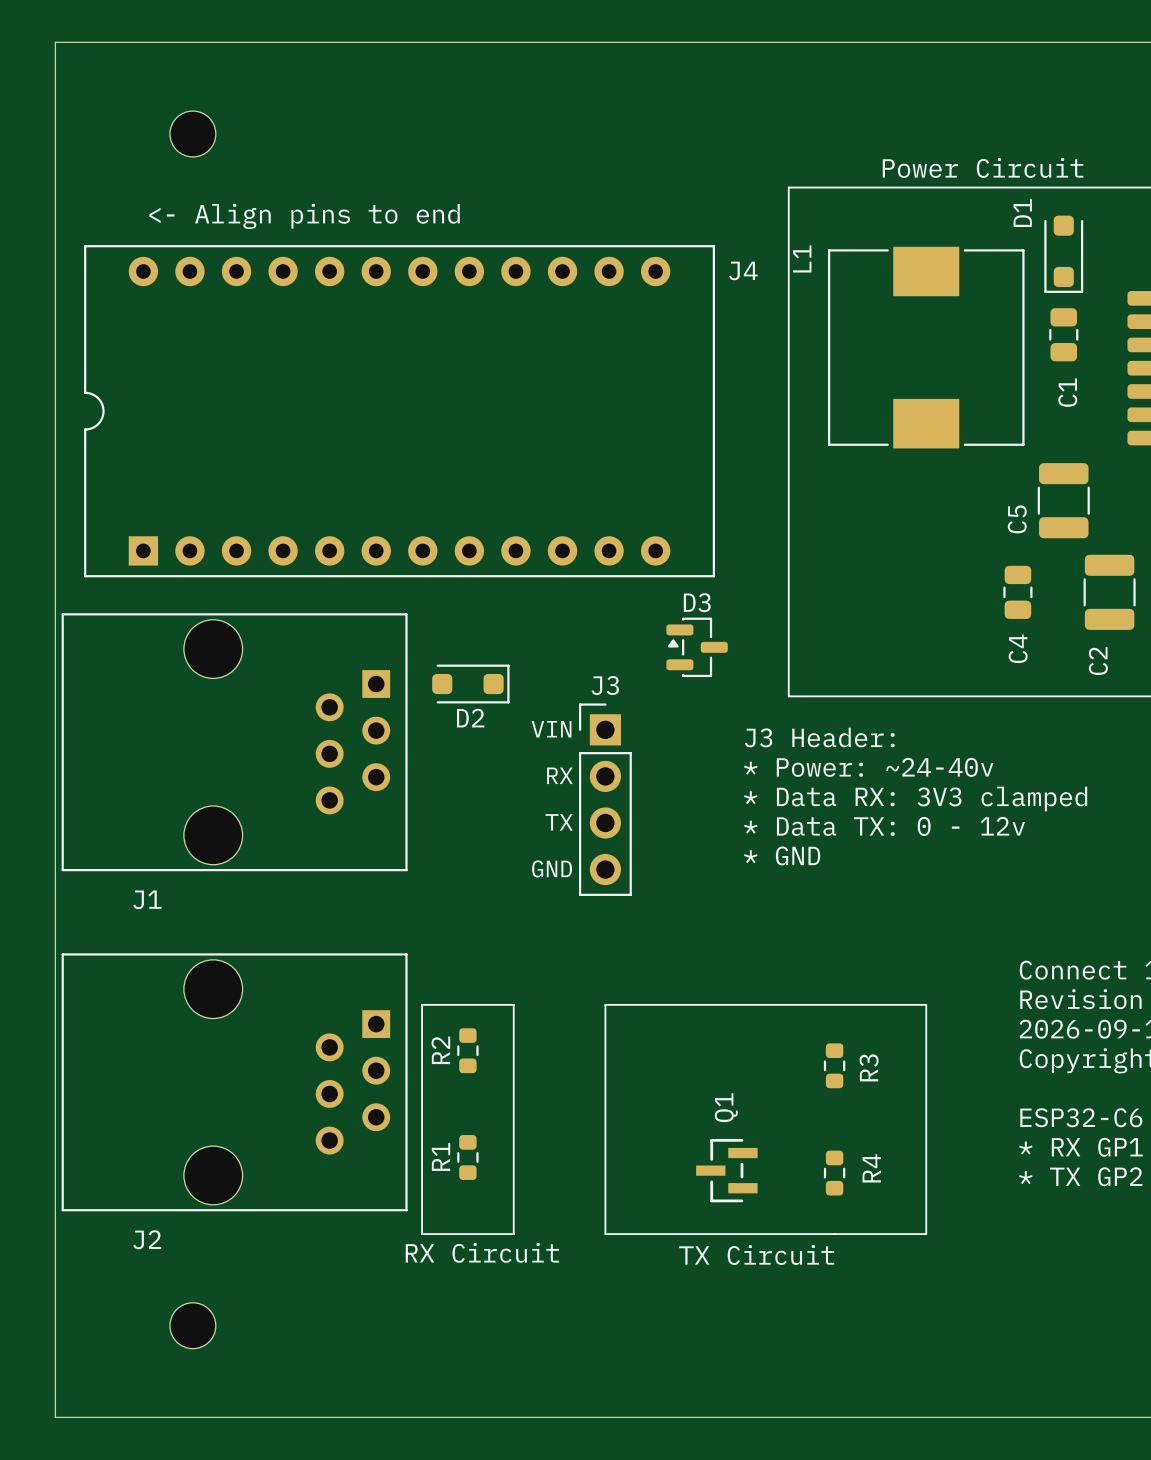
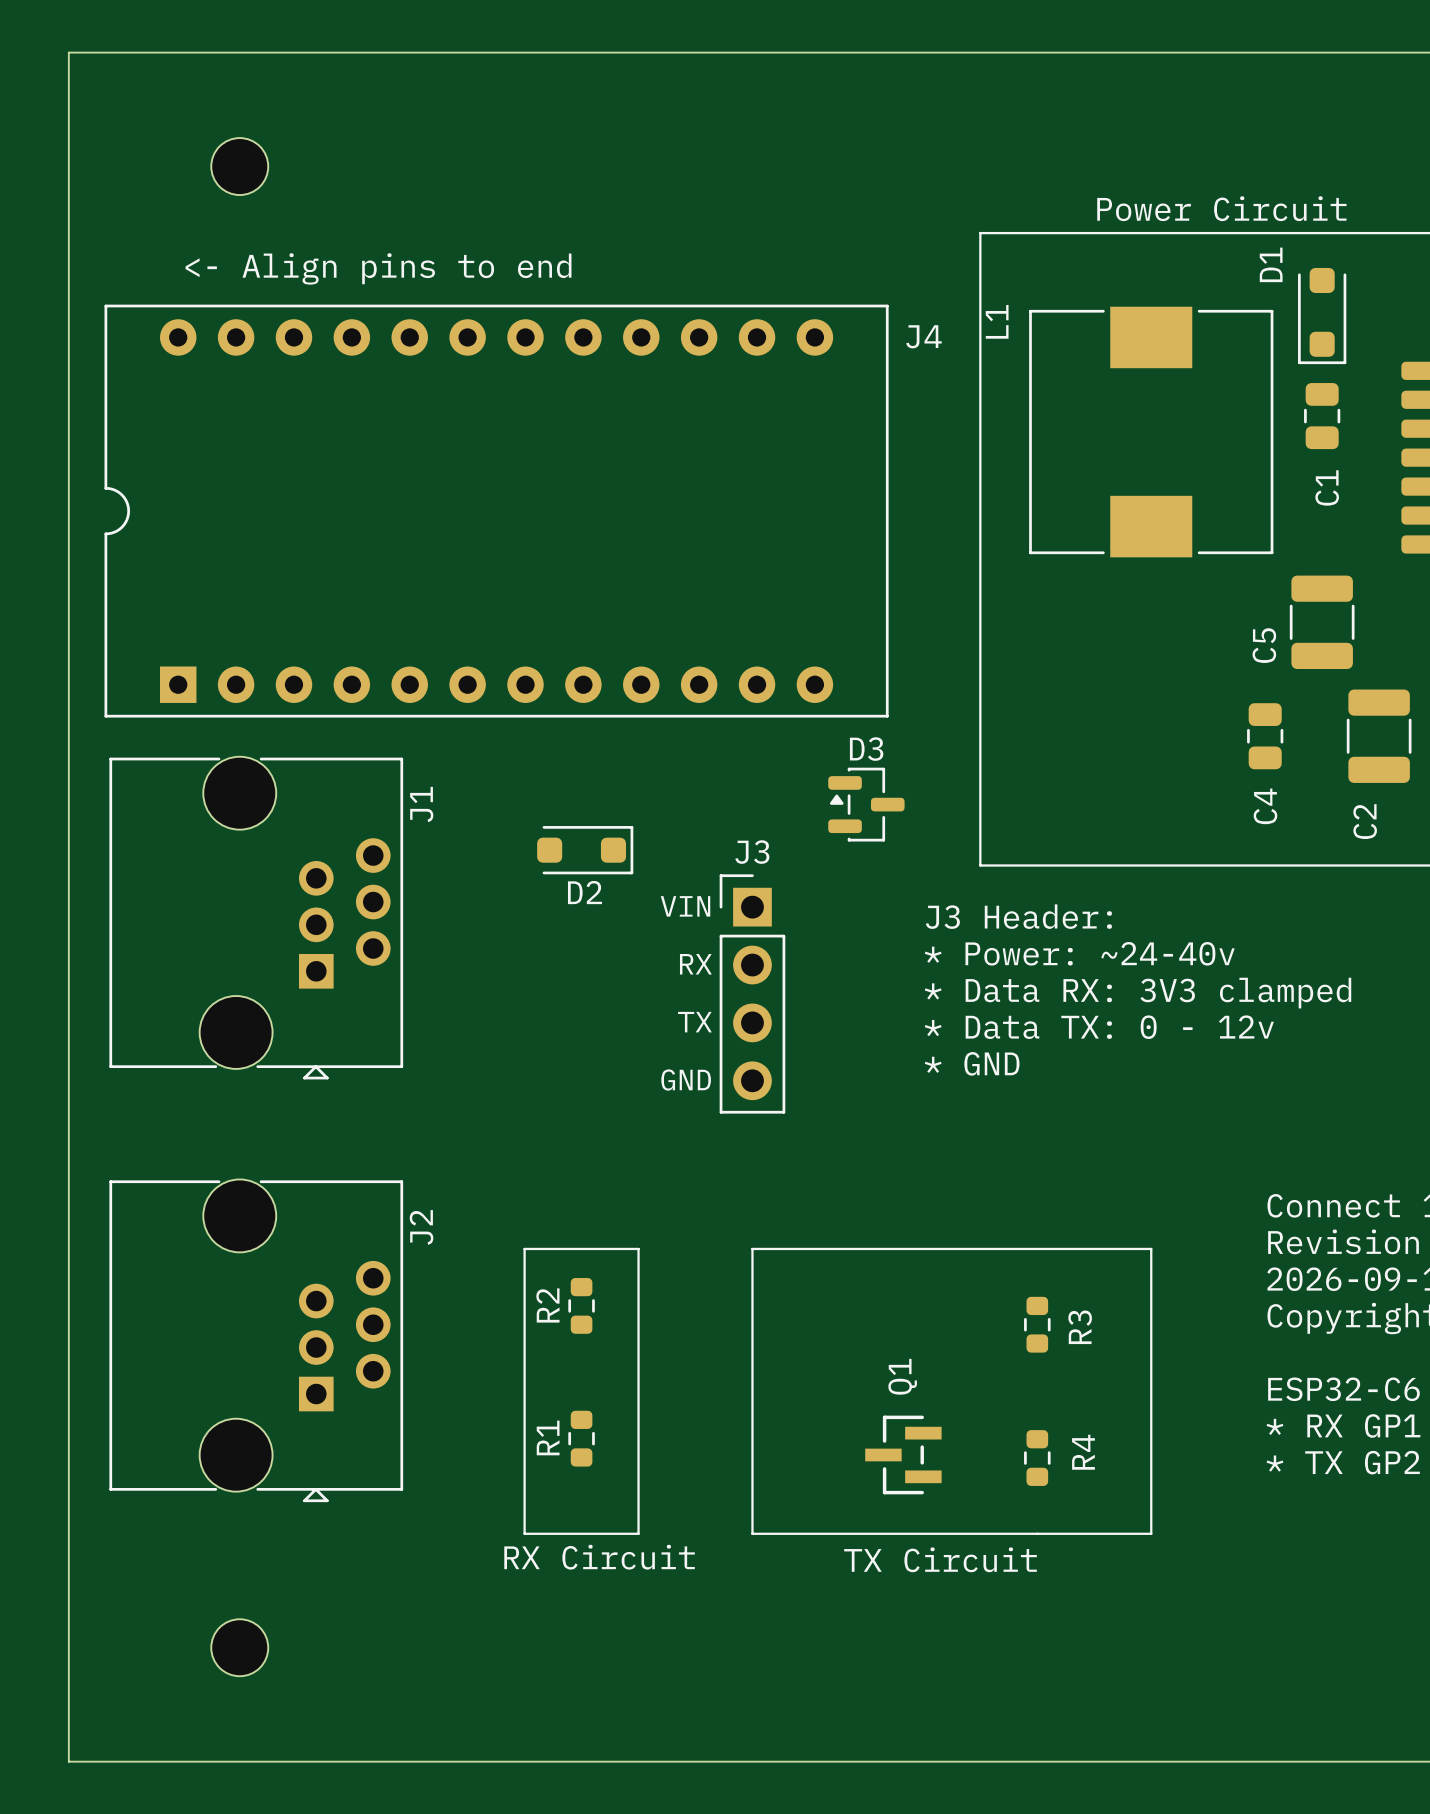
J1 footprint: [61, 613, 408, 872] -> [109, 756, 404, 1080]
J1 name position: J1 (147, 899) -> J1 (421, 804)
J2 footprint: [61, 953, 408, 1212] -> [109, 1179, 404, 1503]
J2 name position: J2 (147, 1239) -> J2 (421, 1227)

